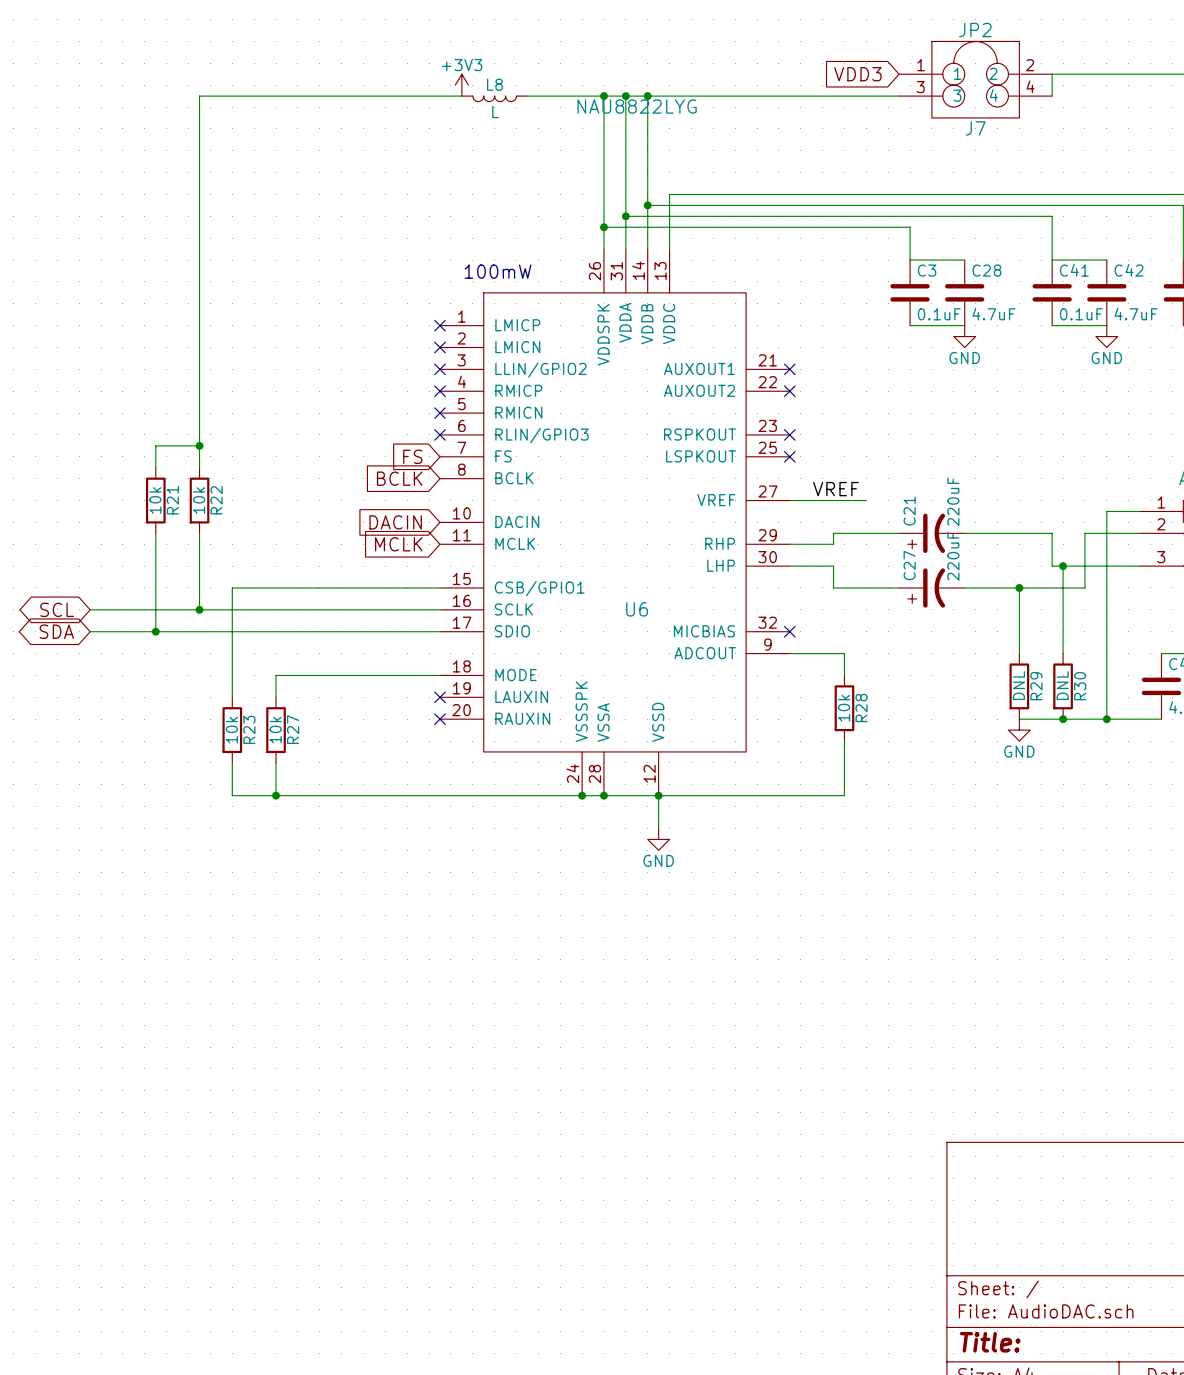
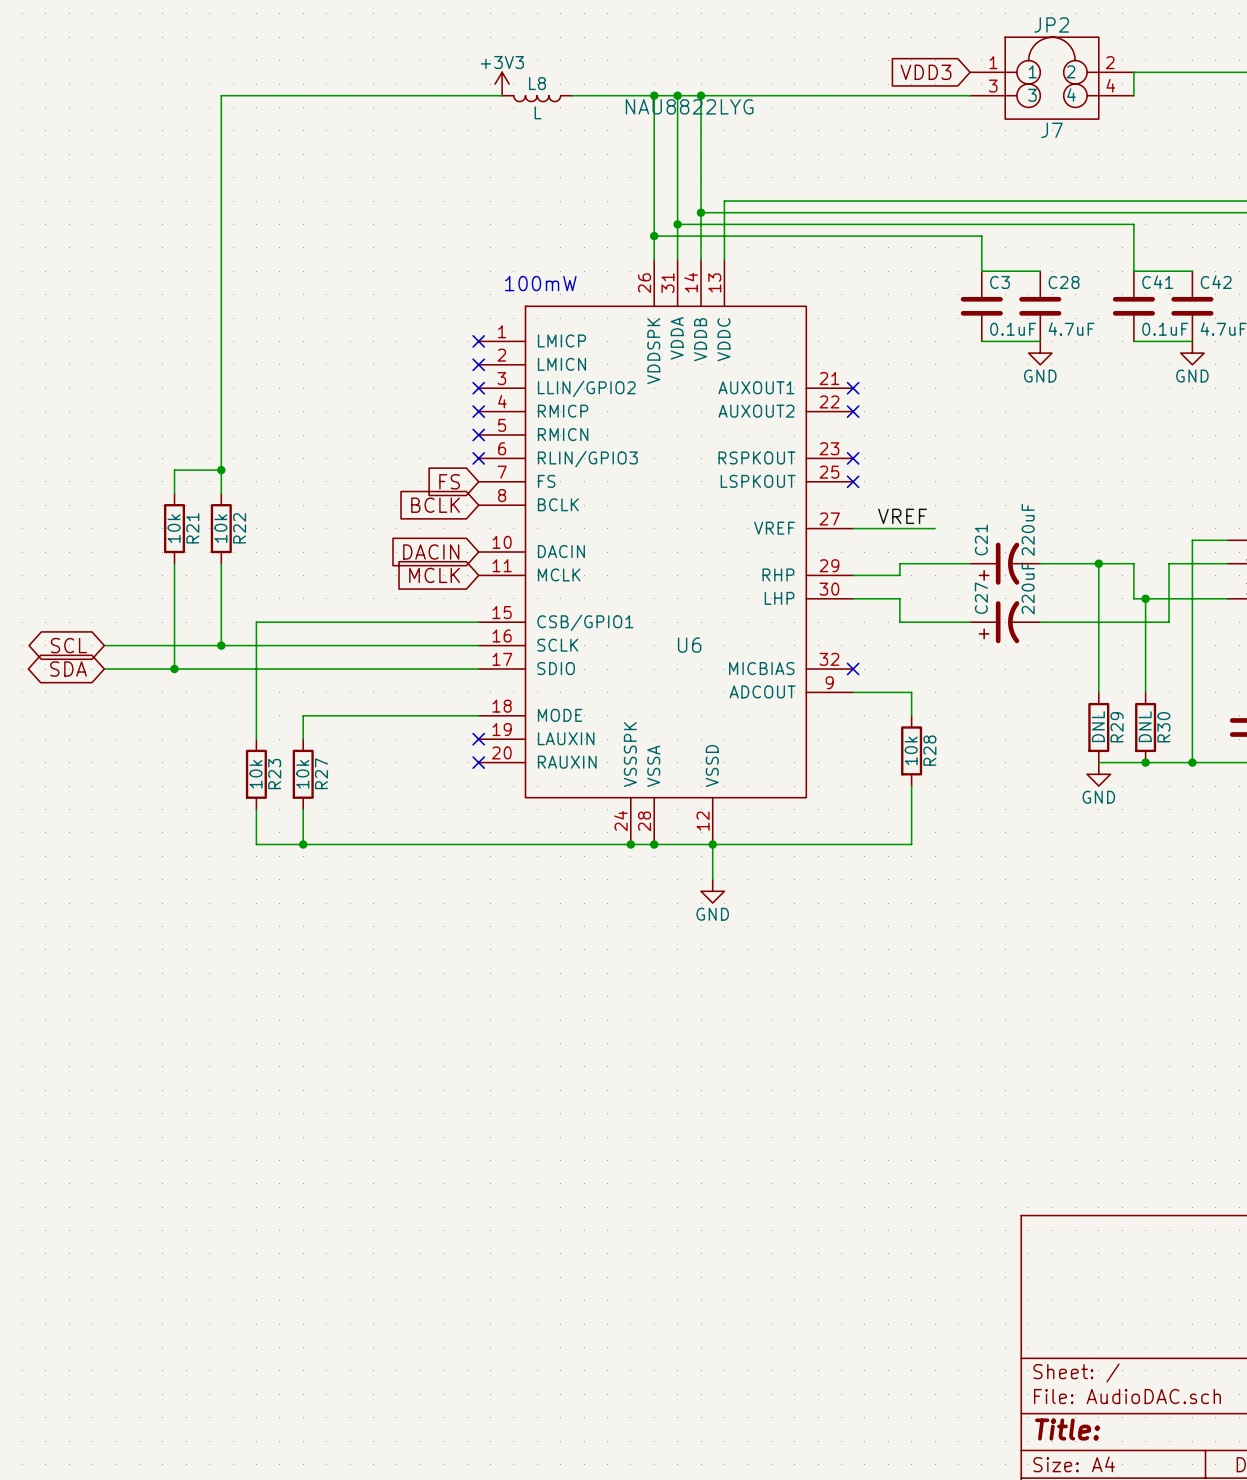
wire: none -> (1098, 563) (1098, 622)
junction: none -> (1098, 563)
junction: (1019, 587) -> none

